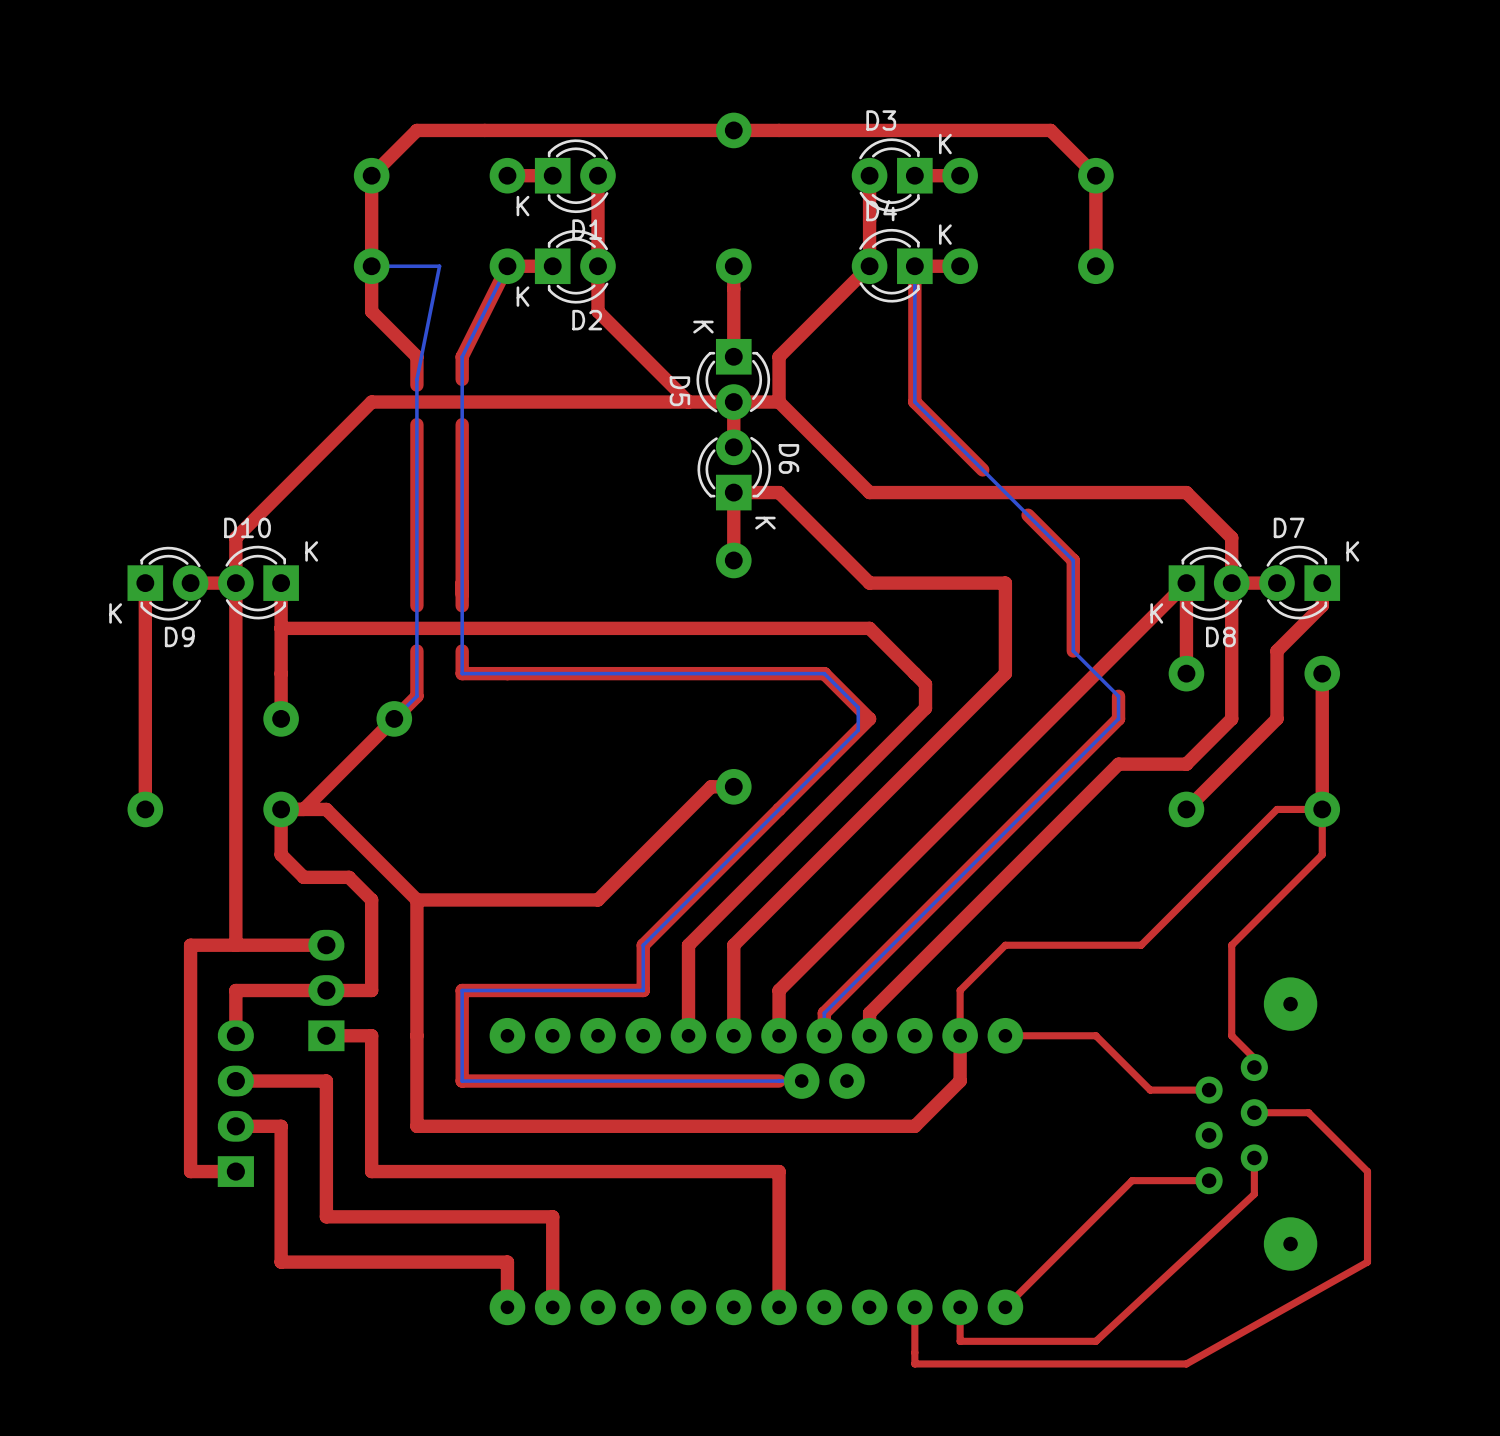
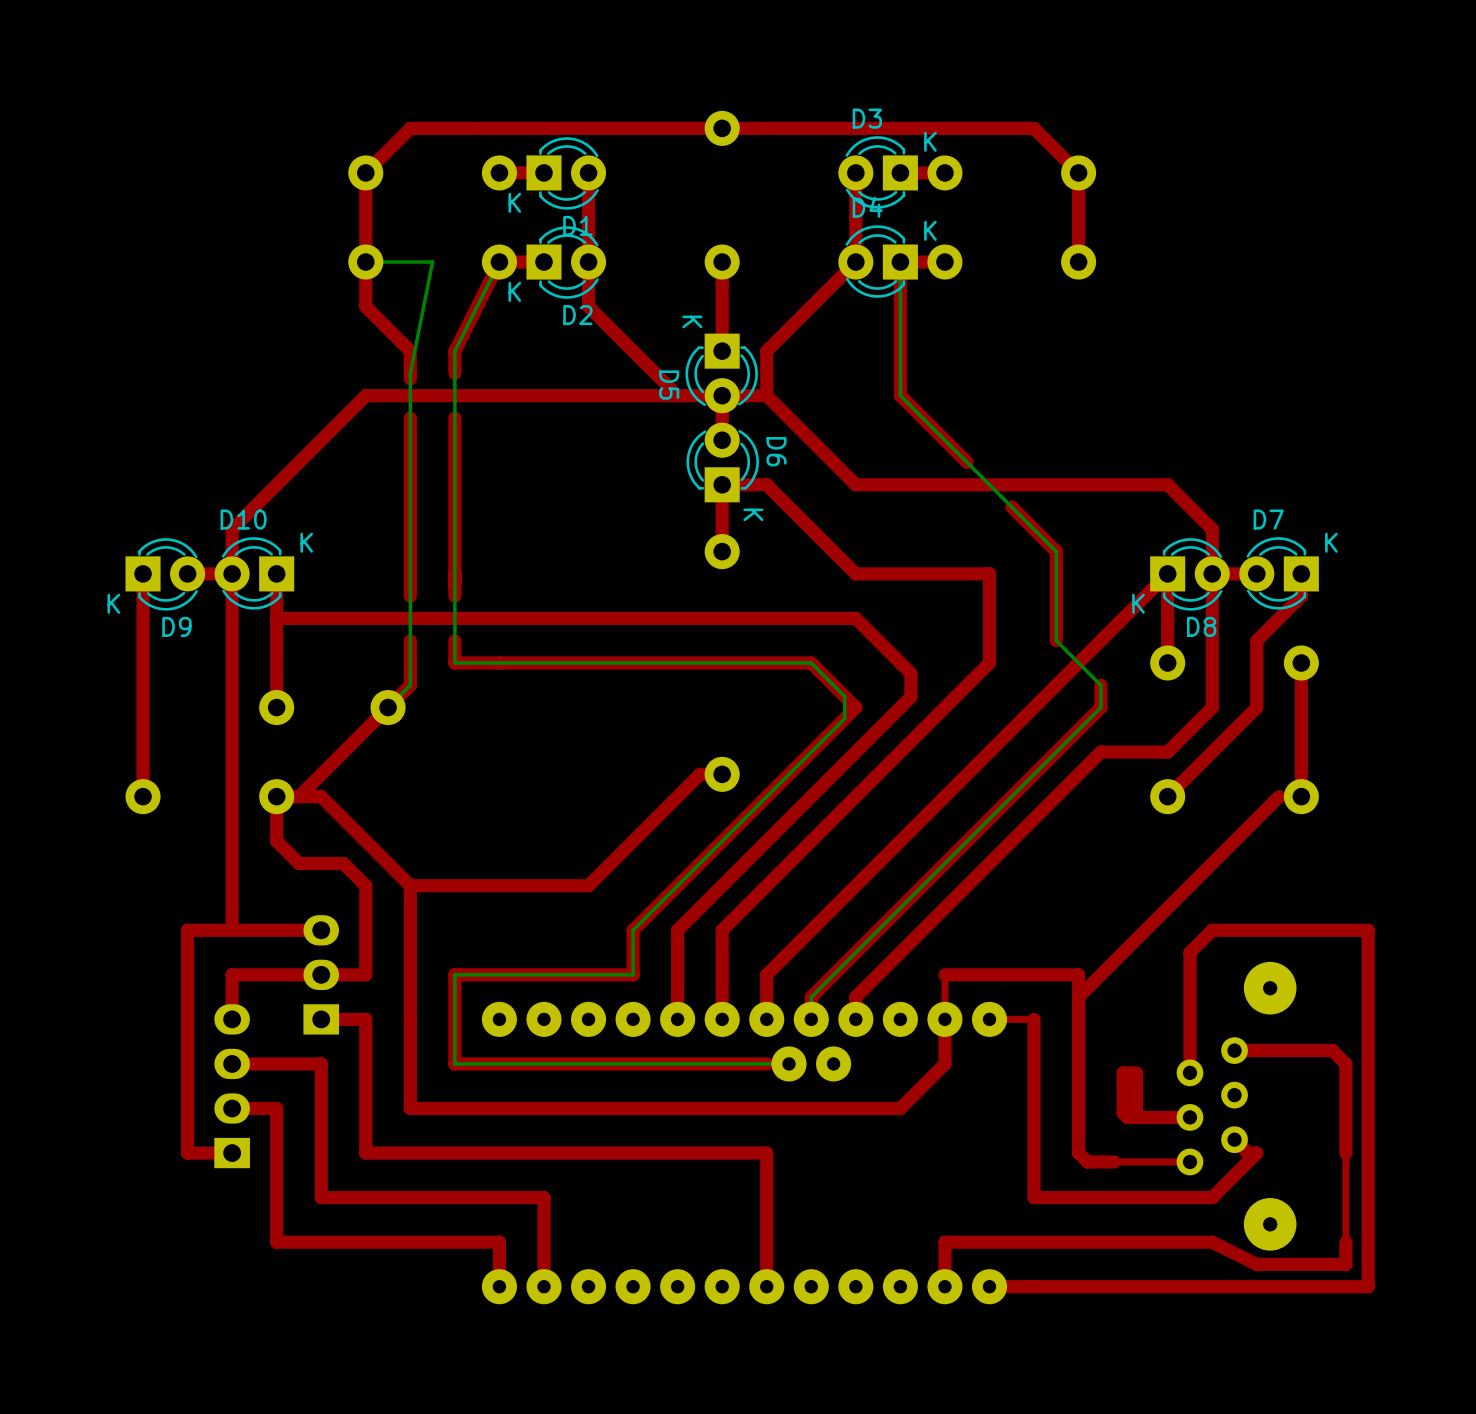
top track: (1299, 809) (1276, 809) (1141, 945) (1005, 945) (960, 990) -> (1279, 796) (1078, 997)
top track: (1322, 809) (1322, 854) (1231, 945) (1231, 1035) (1254, 1058) (1254, 1067) -> none
top track: none -> (944, 974) (1078, 974) (1078, 1153) (1087, 1161) (1114, 1161)
top track: (1050, 1035) (1095, 1035) (1150, 1090) -> (1034, 1019) (1034, 1197) (1212, 1197) (1256, 1153) (1247, 1153) (1234, 1139)
top track: none -> (1132, 1072) (1123, 1072) (1123, 1112) (1127, 1117) (1189, 1117)
top track: (1209, 1090) (1154, 1090) -> (1136, 1112) (1136, 1072)
top track: (1254, 1112) (1308, 1112) (1367, 1171) -> (1234, 1050) (1332, 1050) (1345, 1063) (1345, 1153)
top track: (1254, 1157) (1254, 1194) (1095, 1341) (960, 1341) (960, 1307) -> none
top track: (1132, 1180) (1005, 1307) -> (1189, 1072) (1189, 952) (1212, 930) (1368, 930) (1368, 1286) (989, 1286)
top track: (1367, 1262) (1186, 1363) (914, 1363) (914, 1307) -> (1345, 1242) (1345, 1264) (1256, 1264) (1212, 1242) (944, 1242) (944, 1286)

